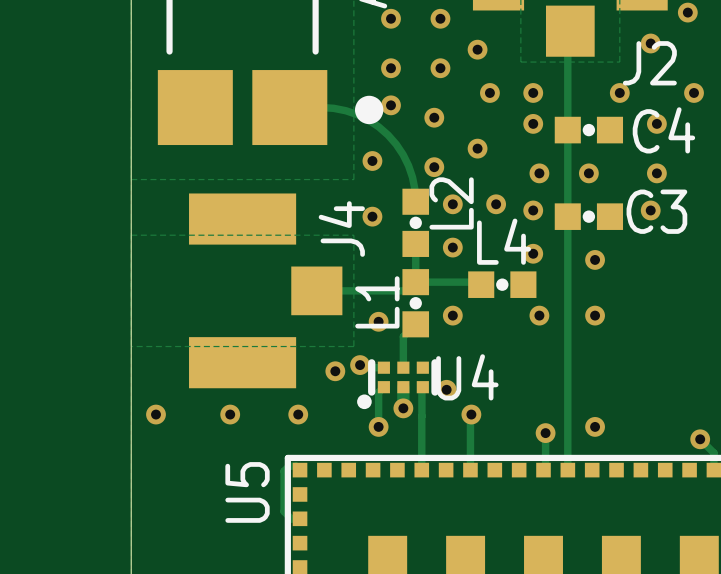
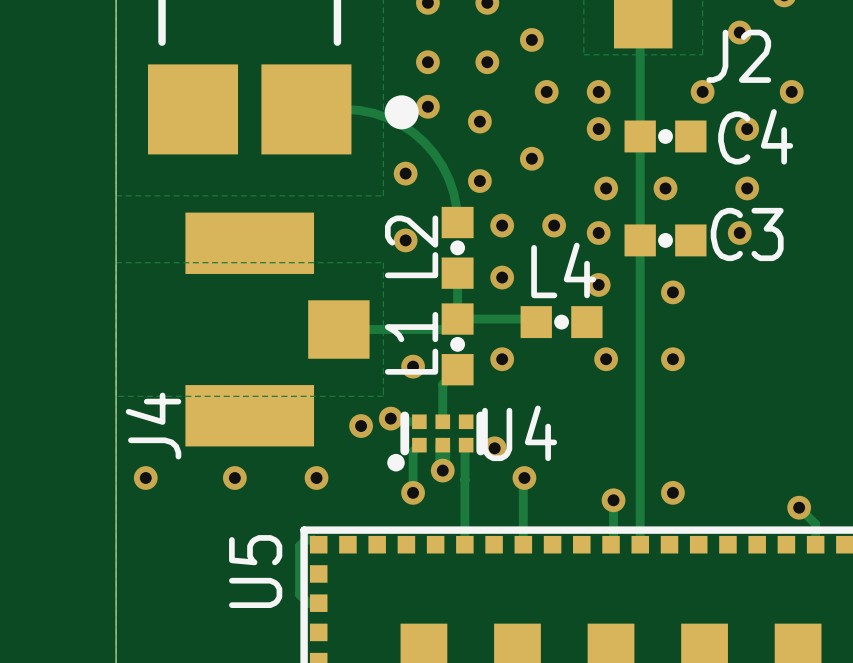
L2 name position: L2 (451, 203) -> L2 (411, 246)
J4 name position: J4 (341, 229) -> J4 (153, 426)

